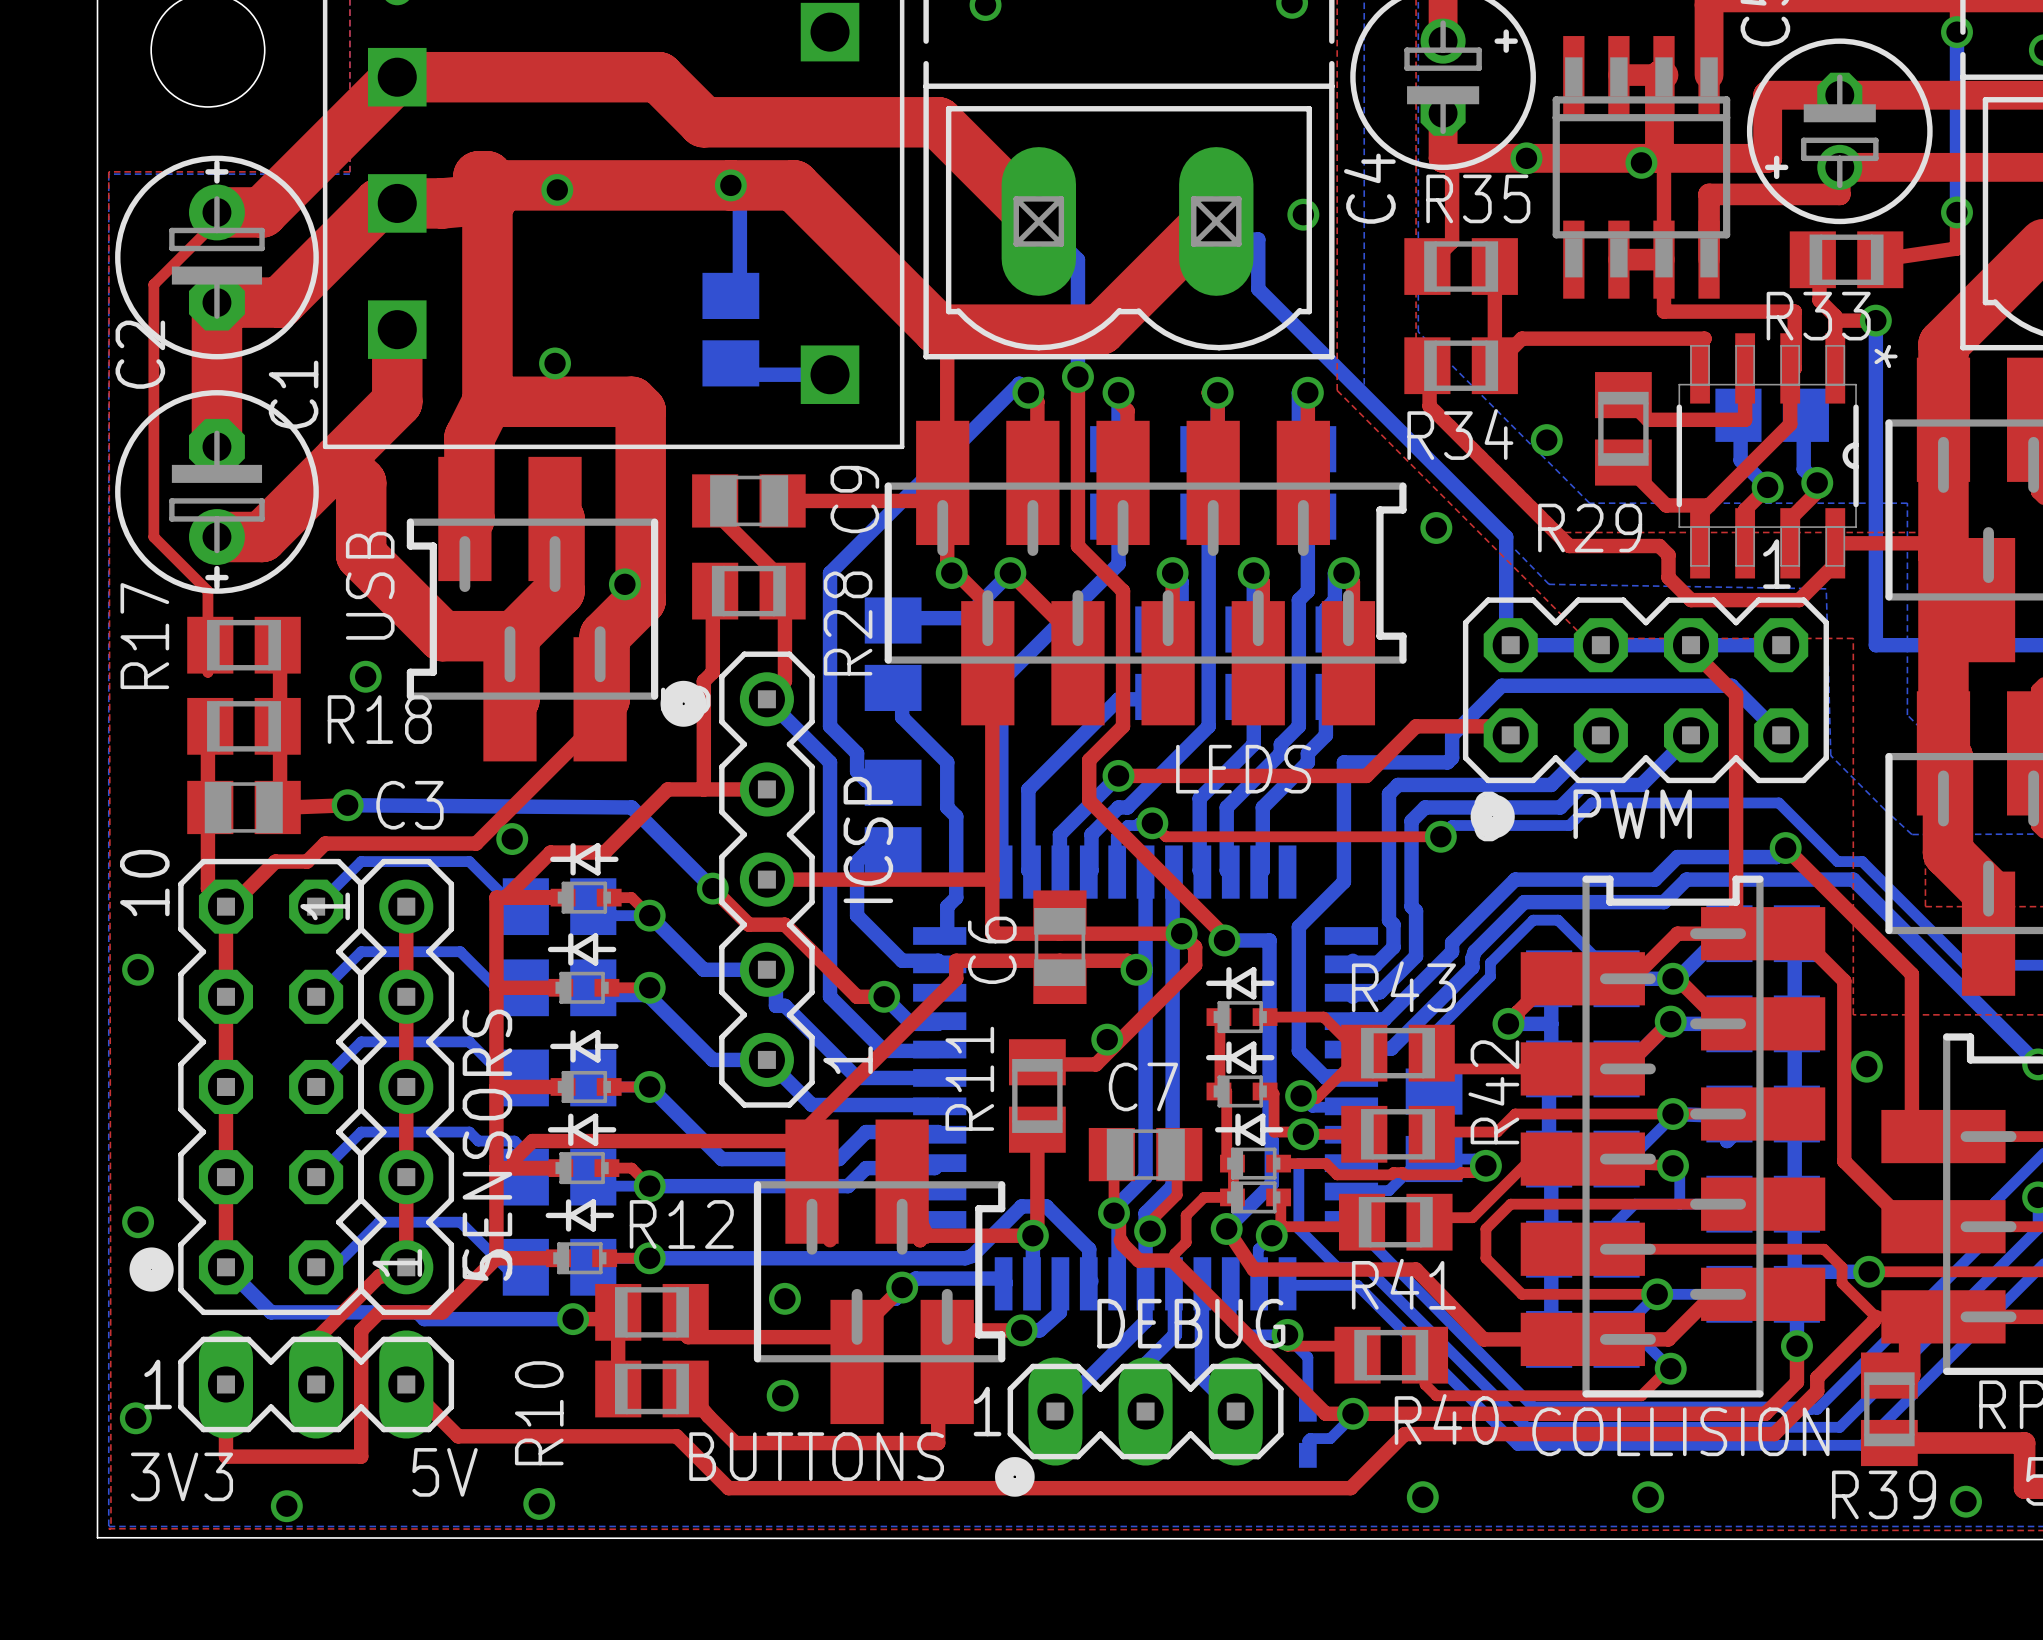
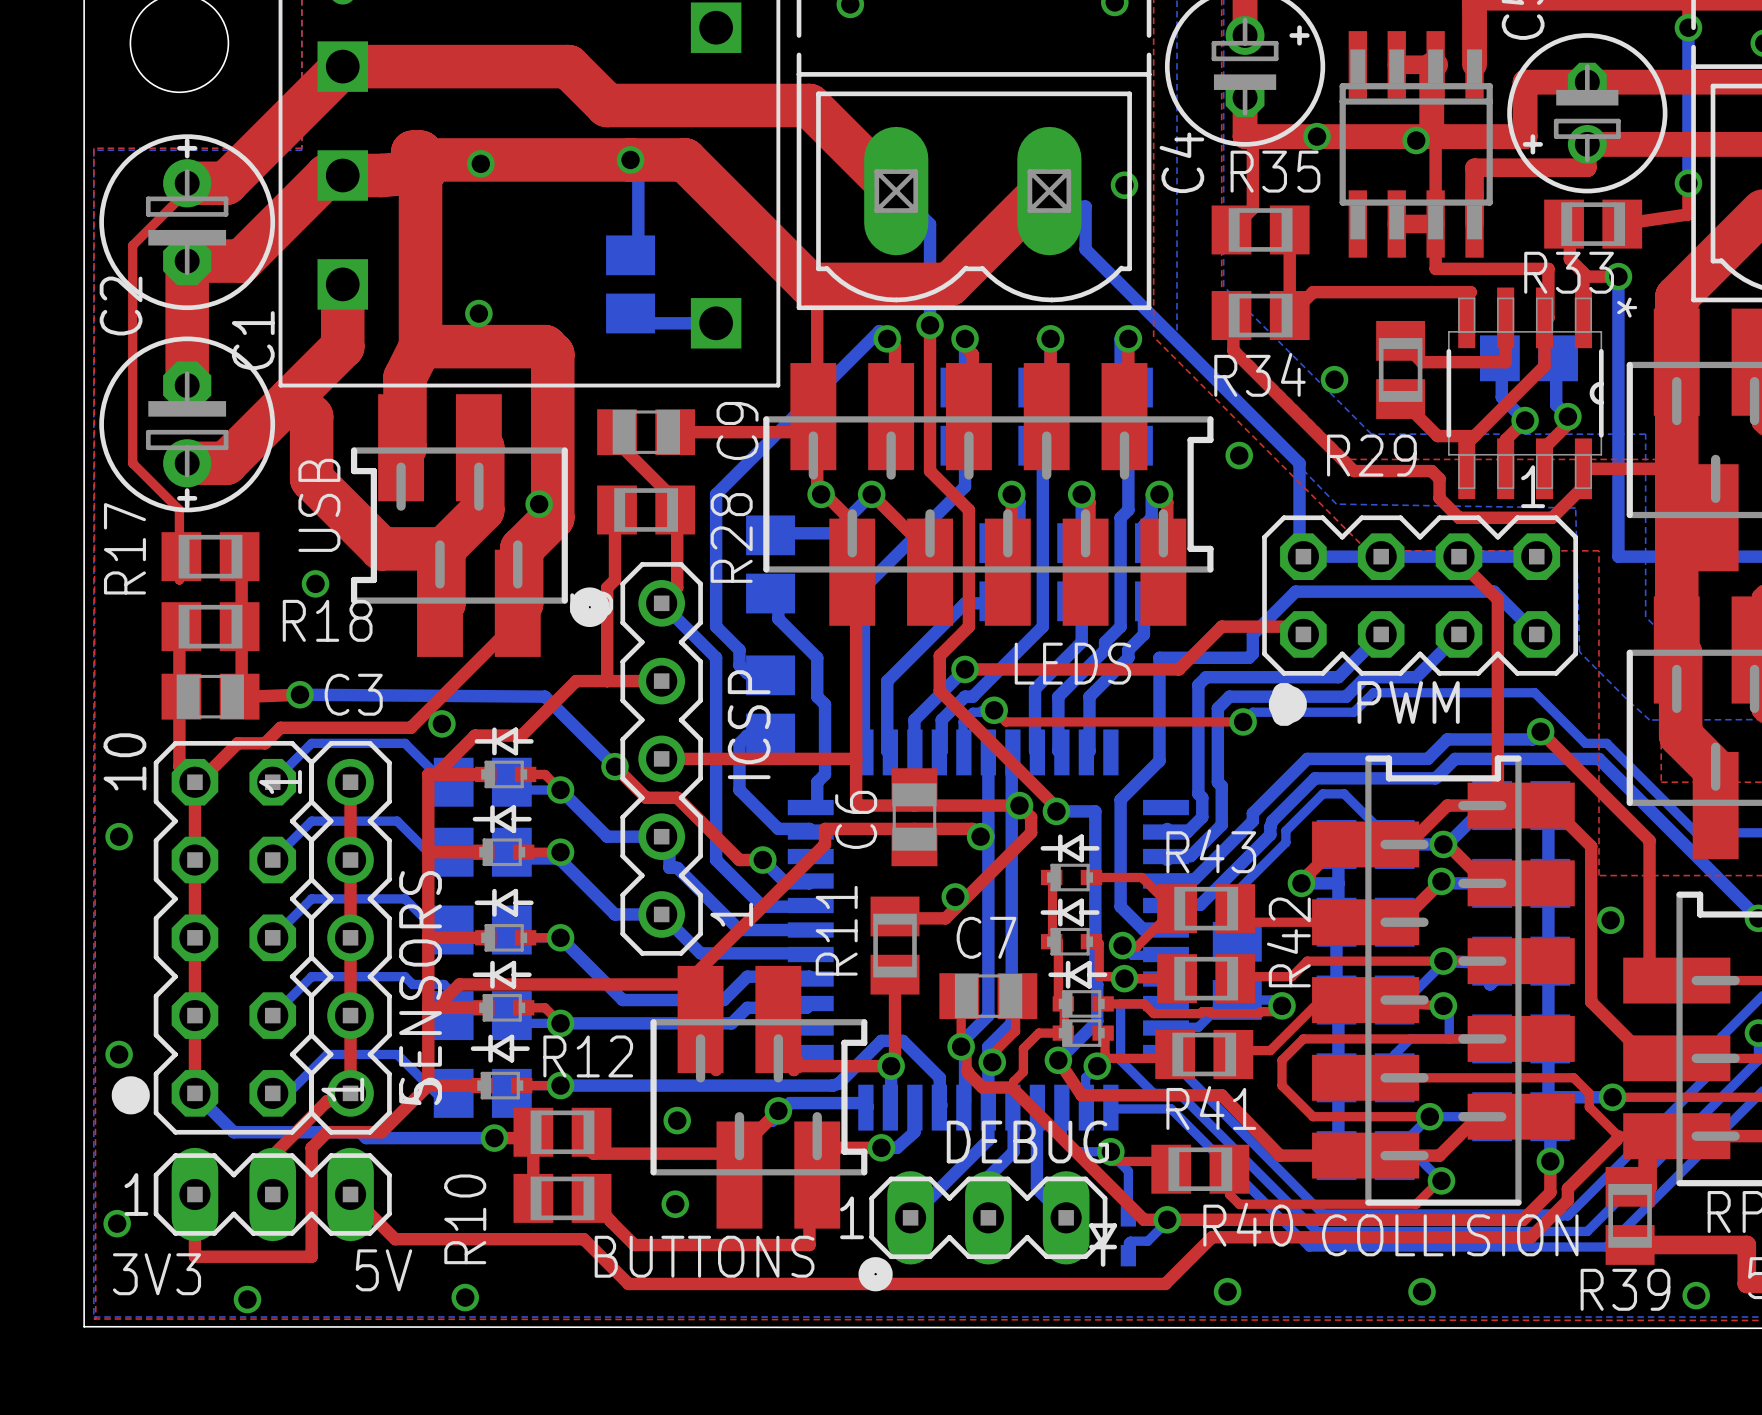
line: none -> (1103, 1245) (1103, 1264)
line: none -> (1103, 1245) (1091, 1225) (1114, 1225) (1103, 1245)
line: none -> (1091, 1247) (1114, 1247)

